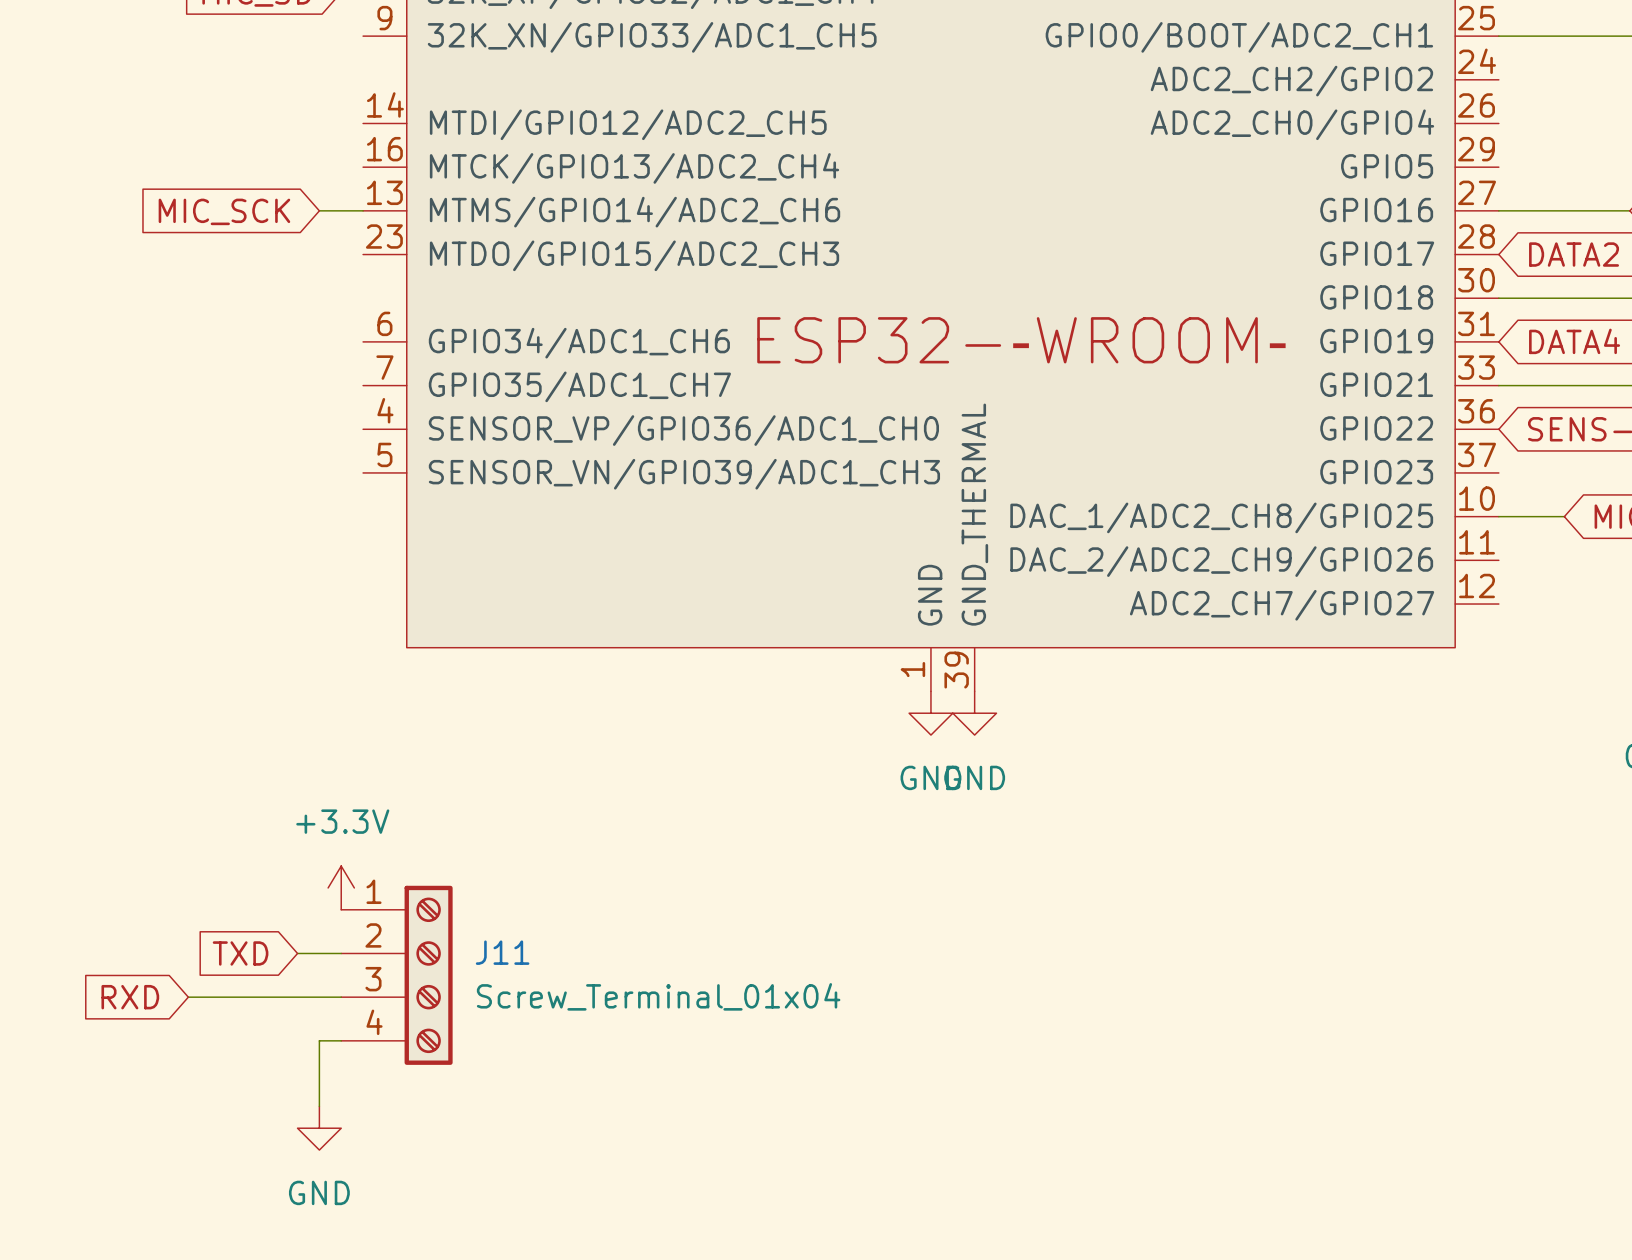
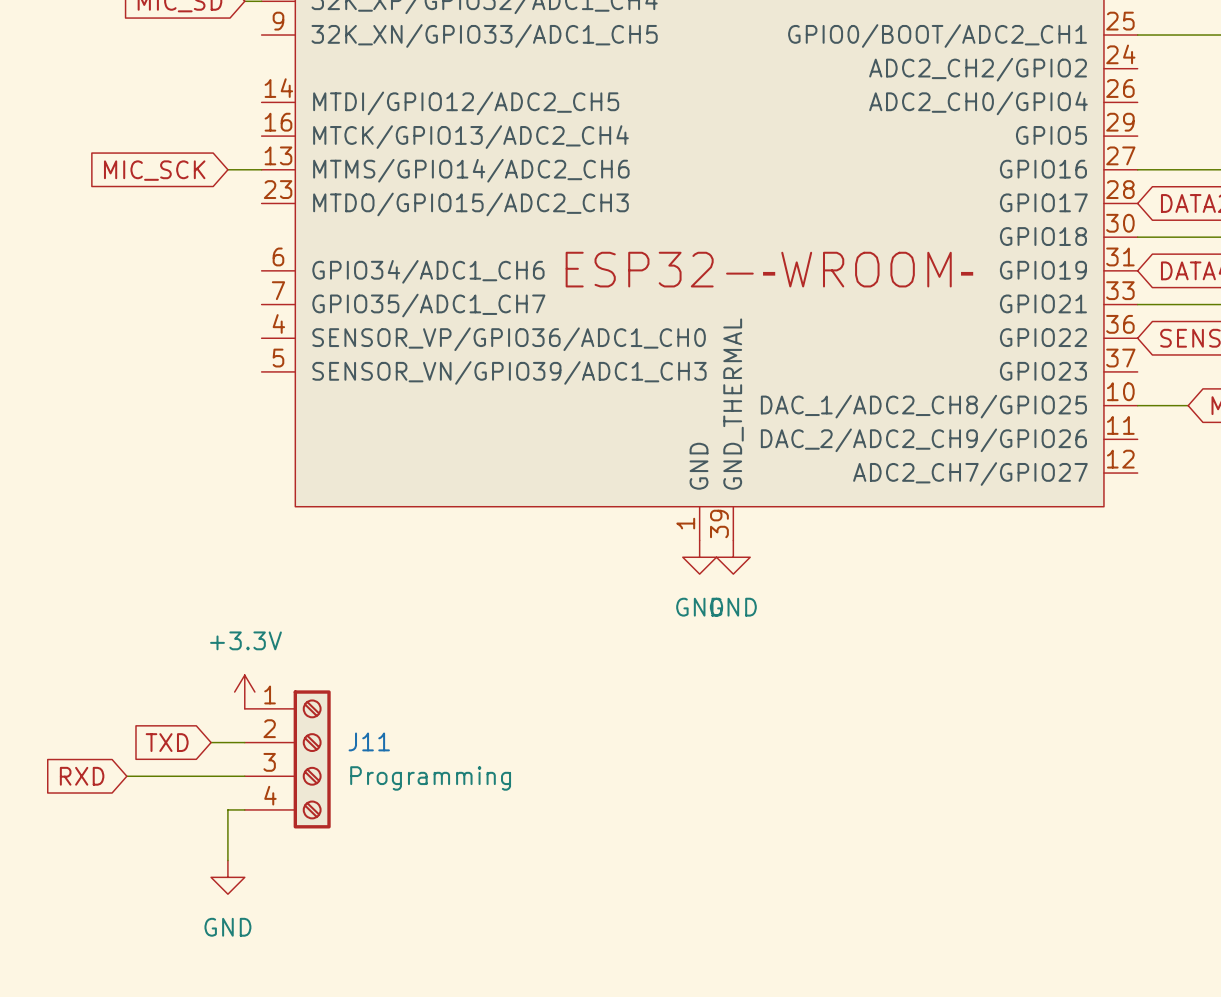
J11 value: Screw_Terminal_01x04 (658, 996) -> Programming (430, 778)

